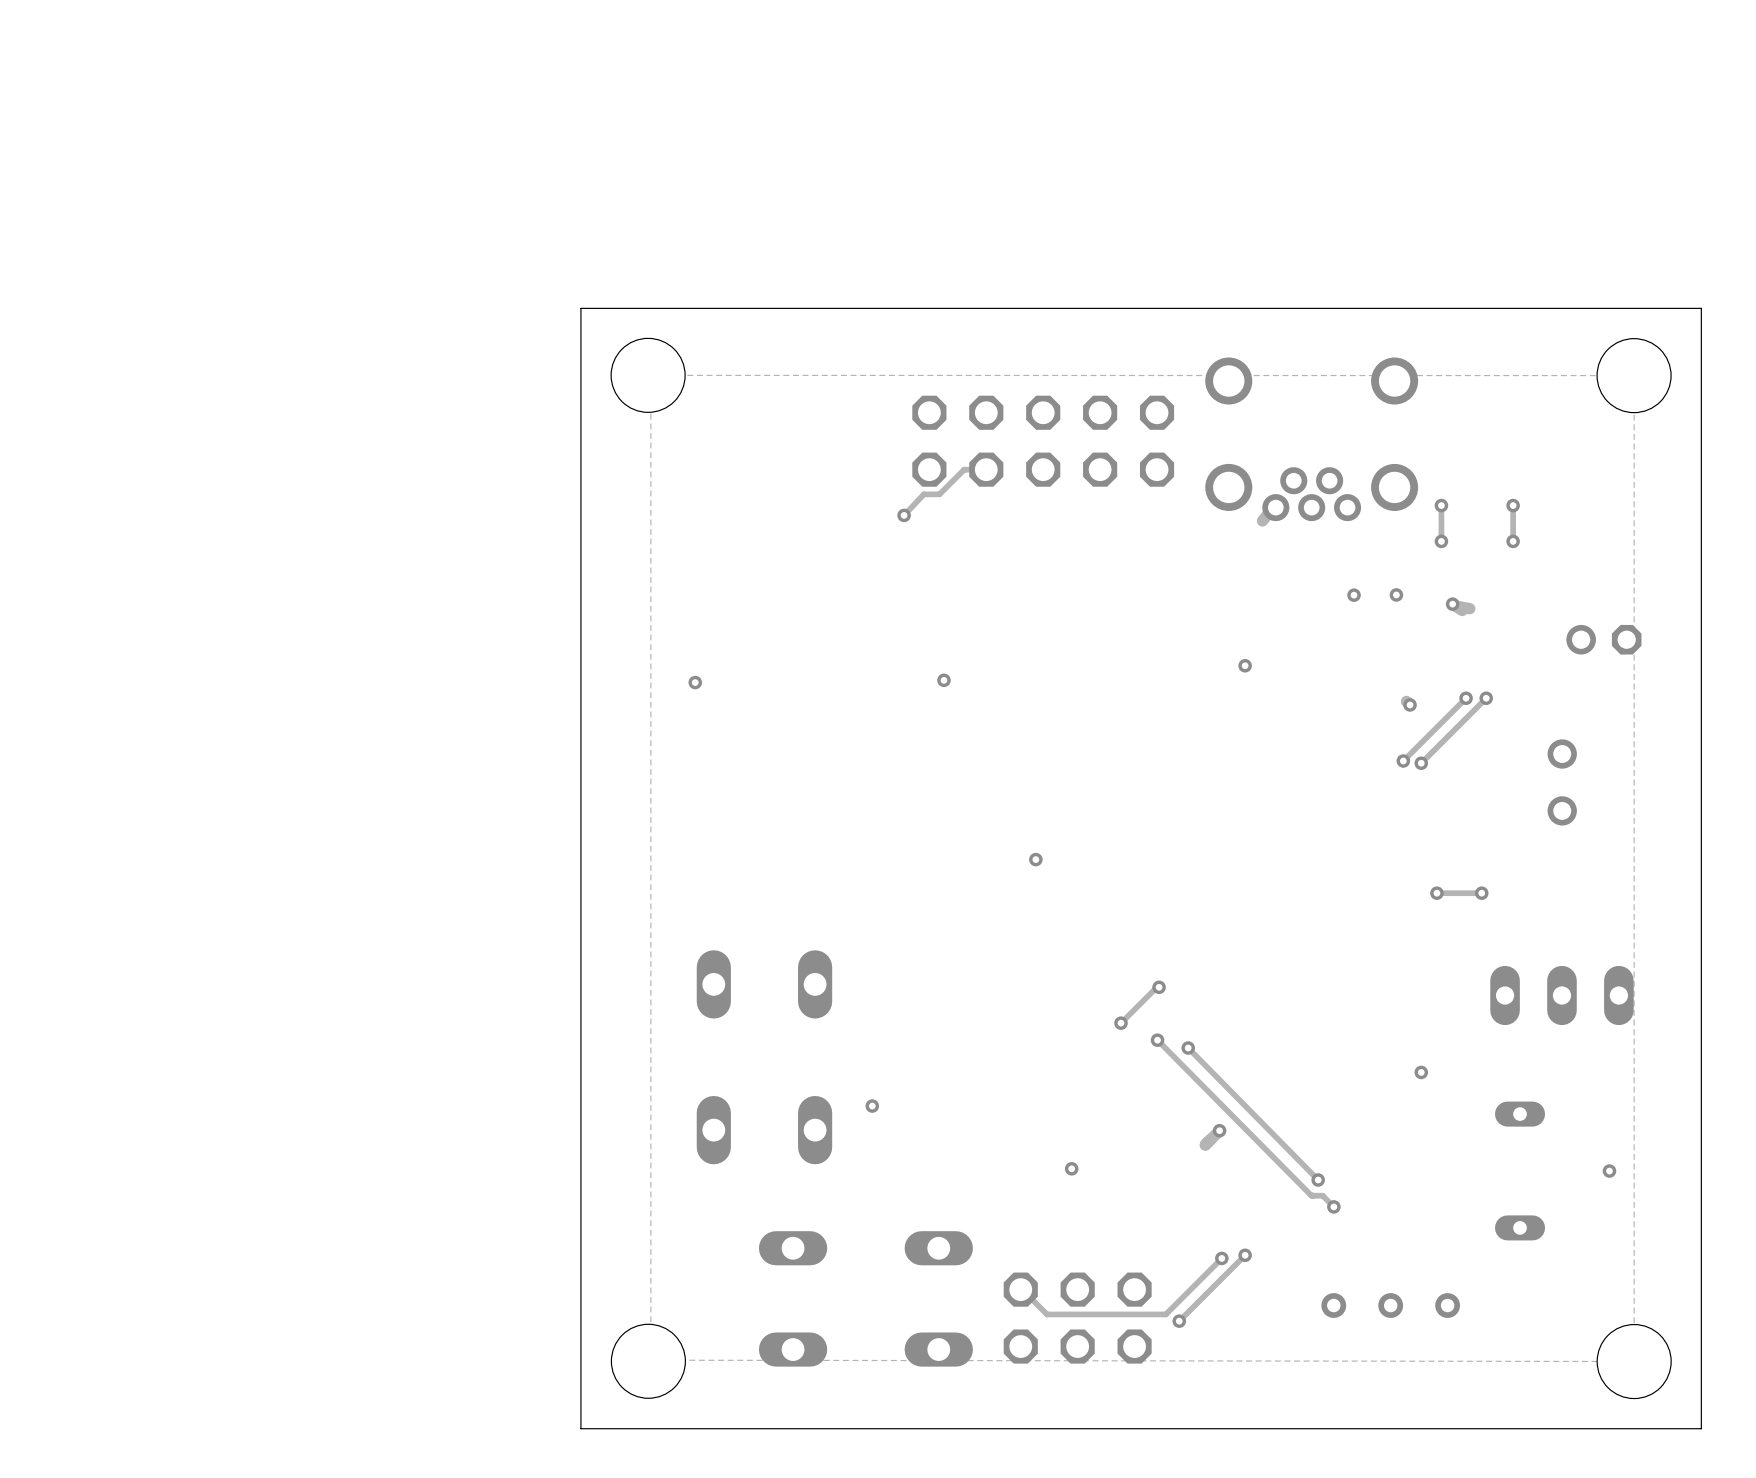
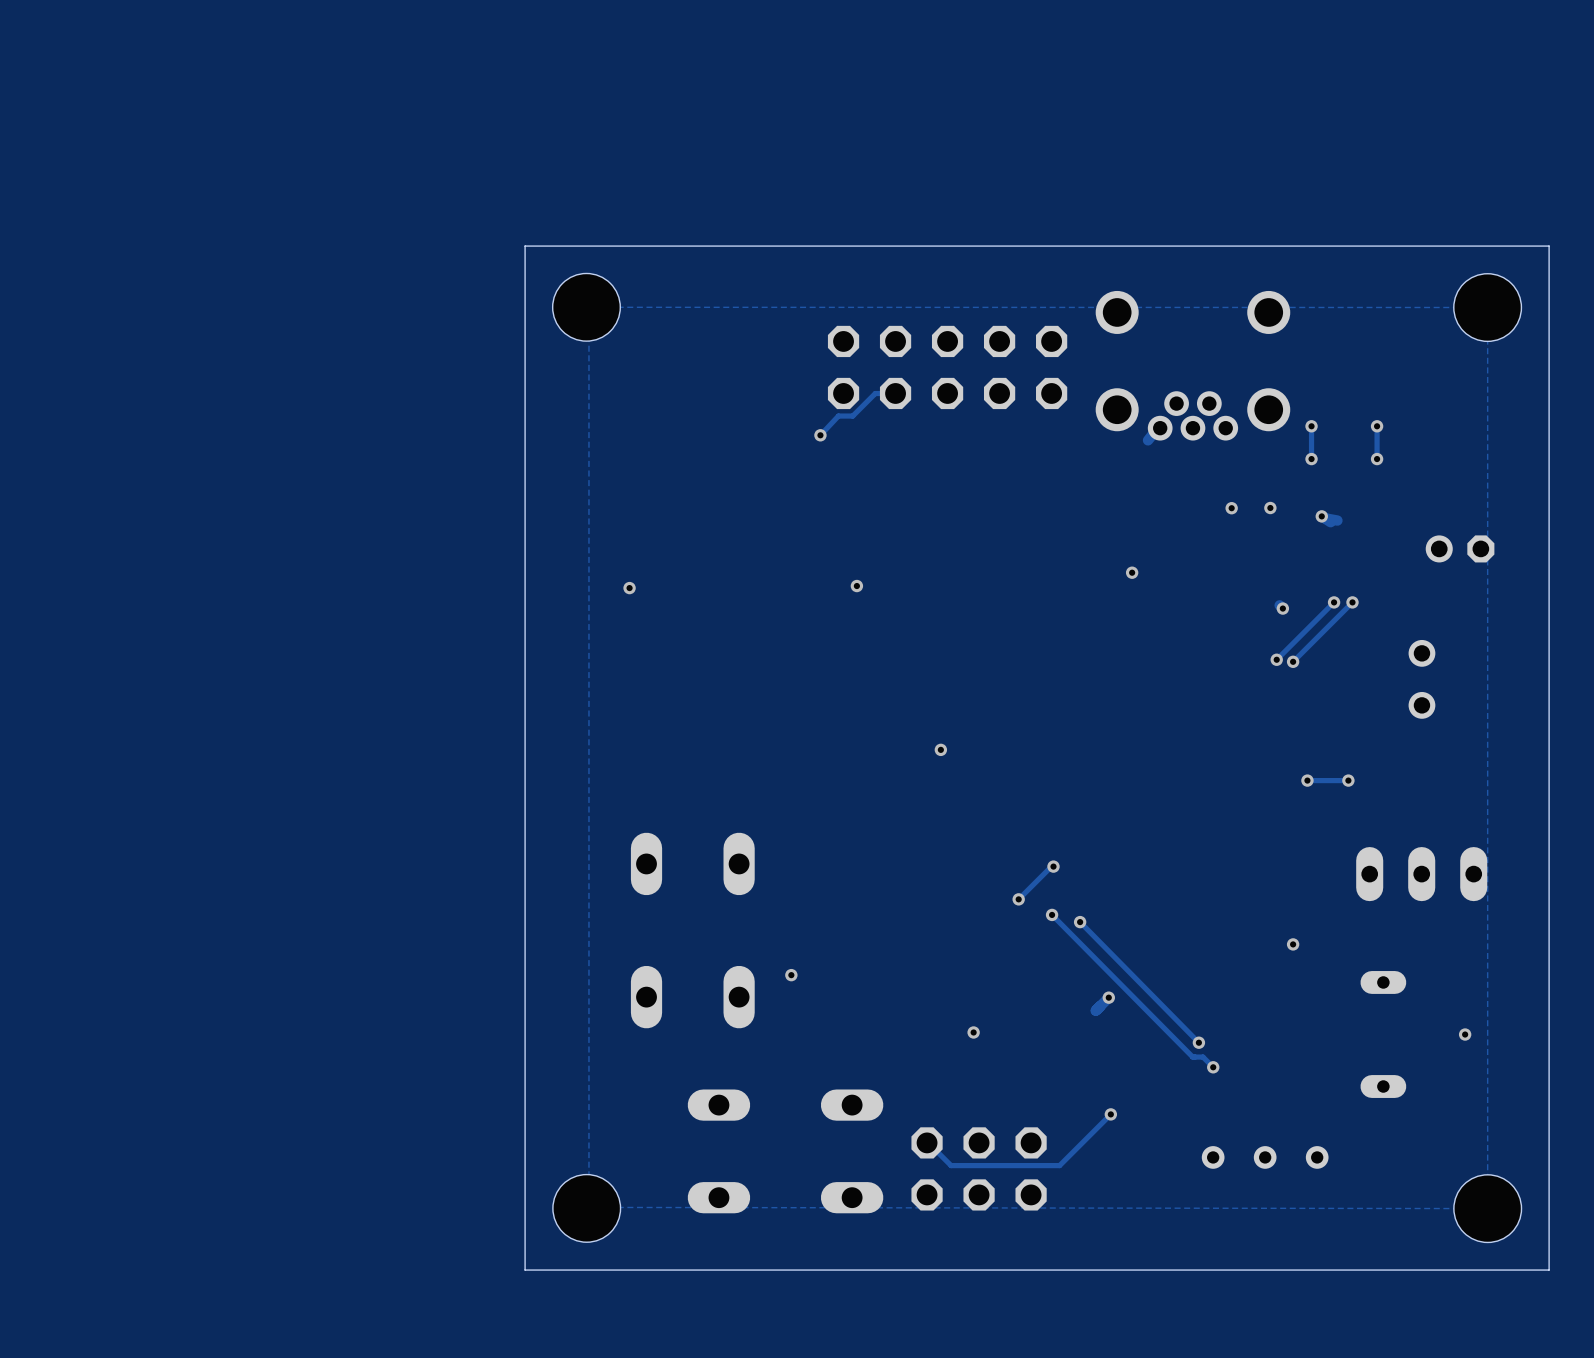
track: (1245, 1255) (1179, 1321) -> none
via: (1245, 1255) -> none
via: (1179, 1321) -> none

